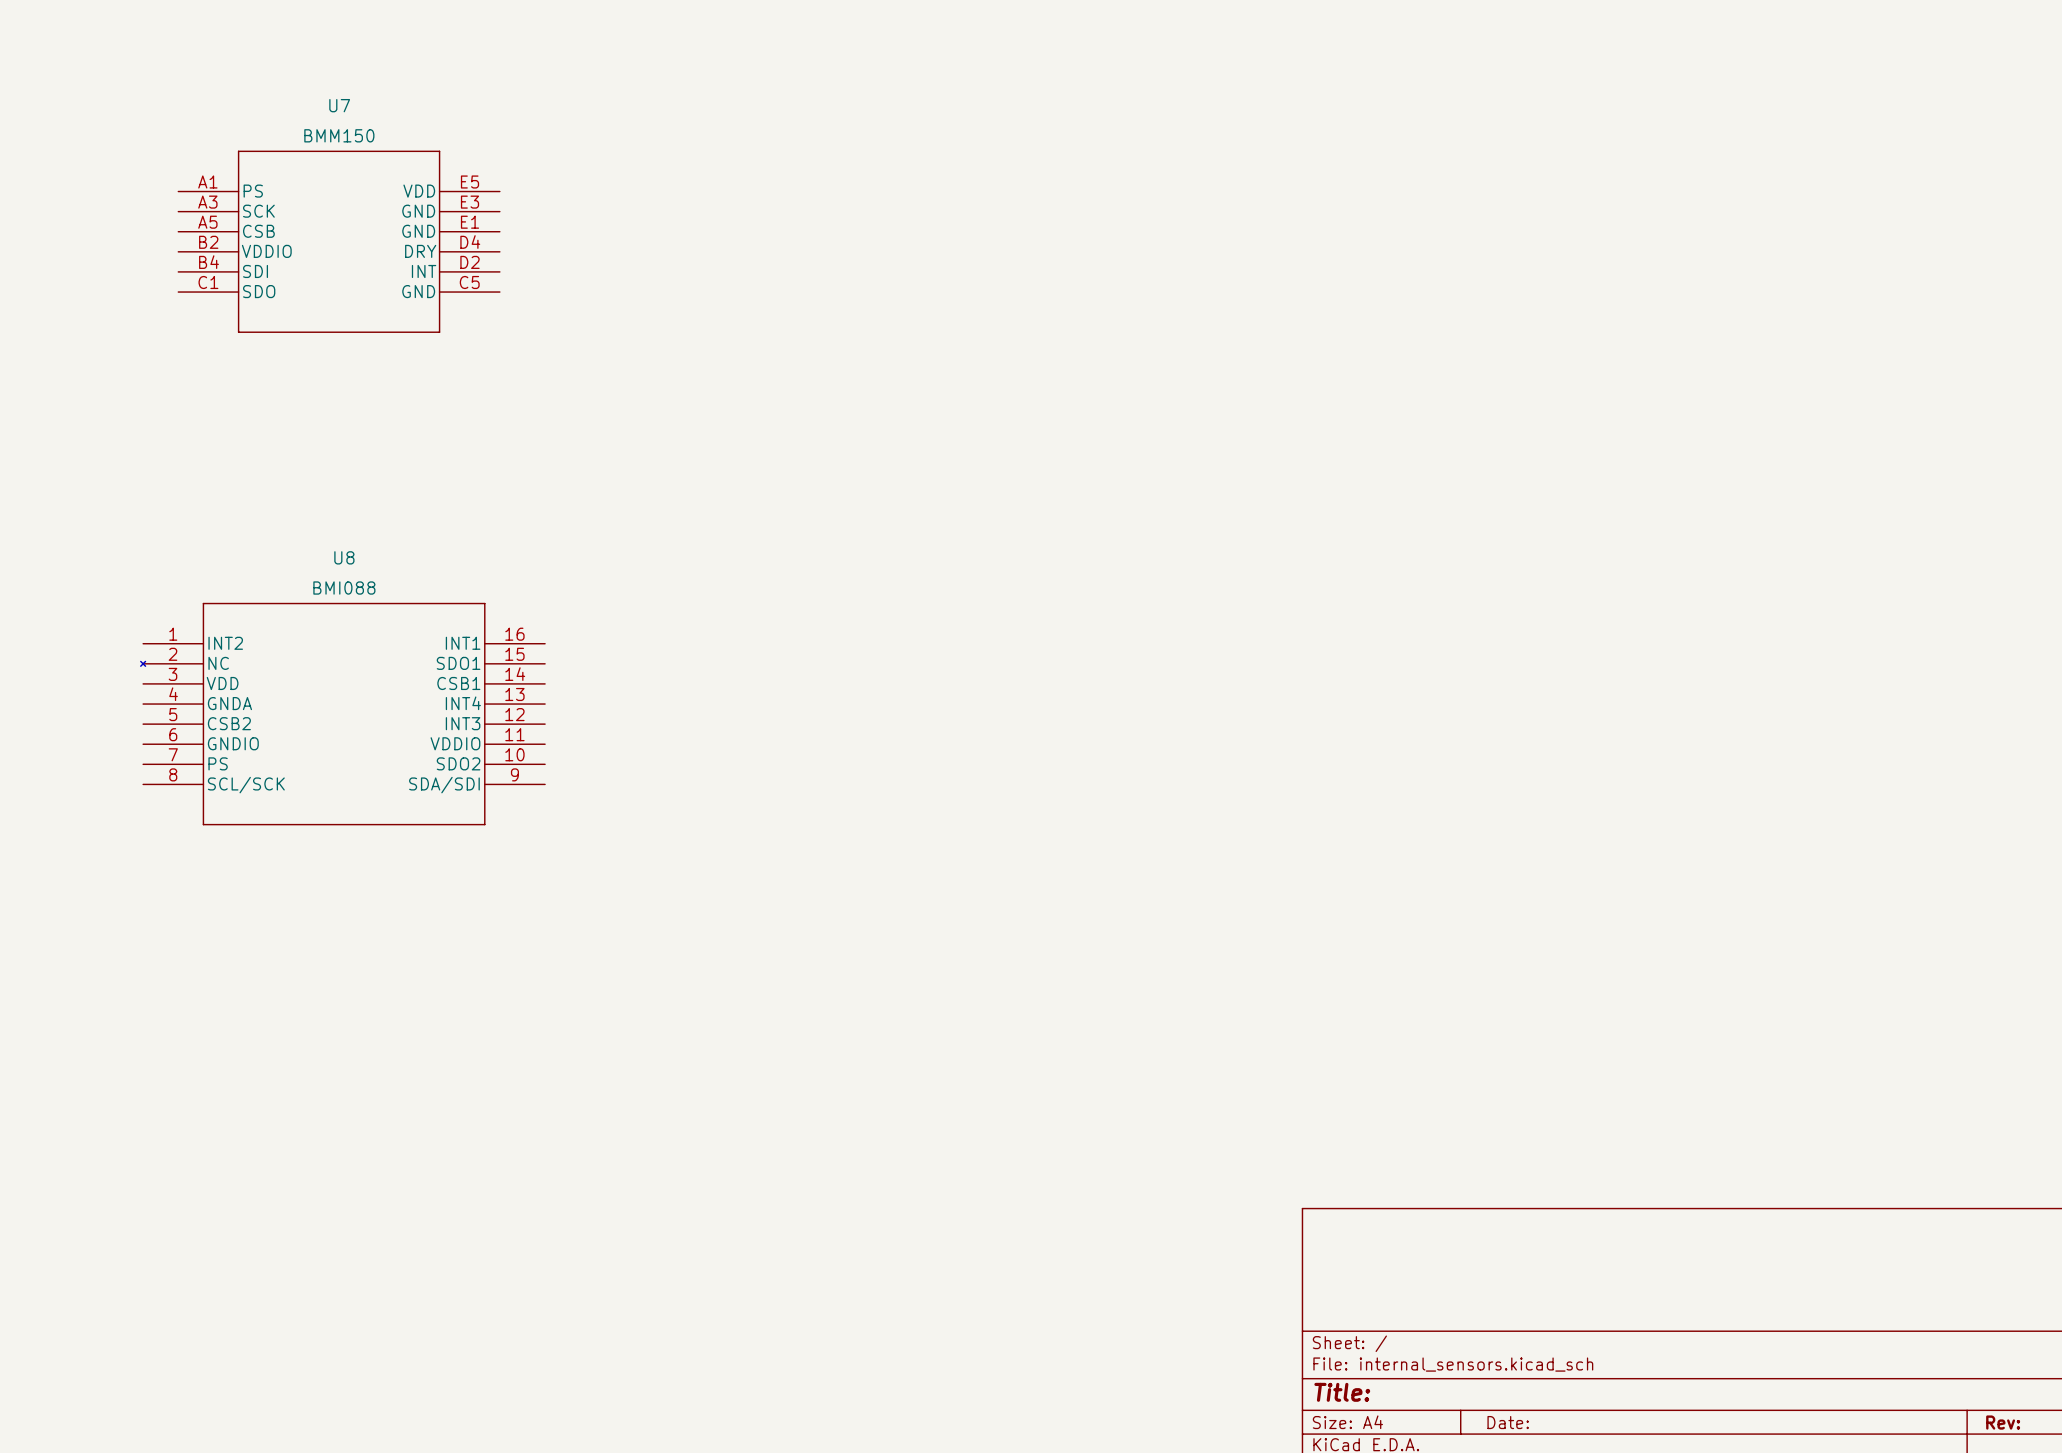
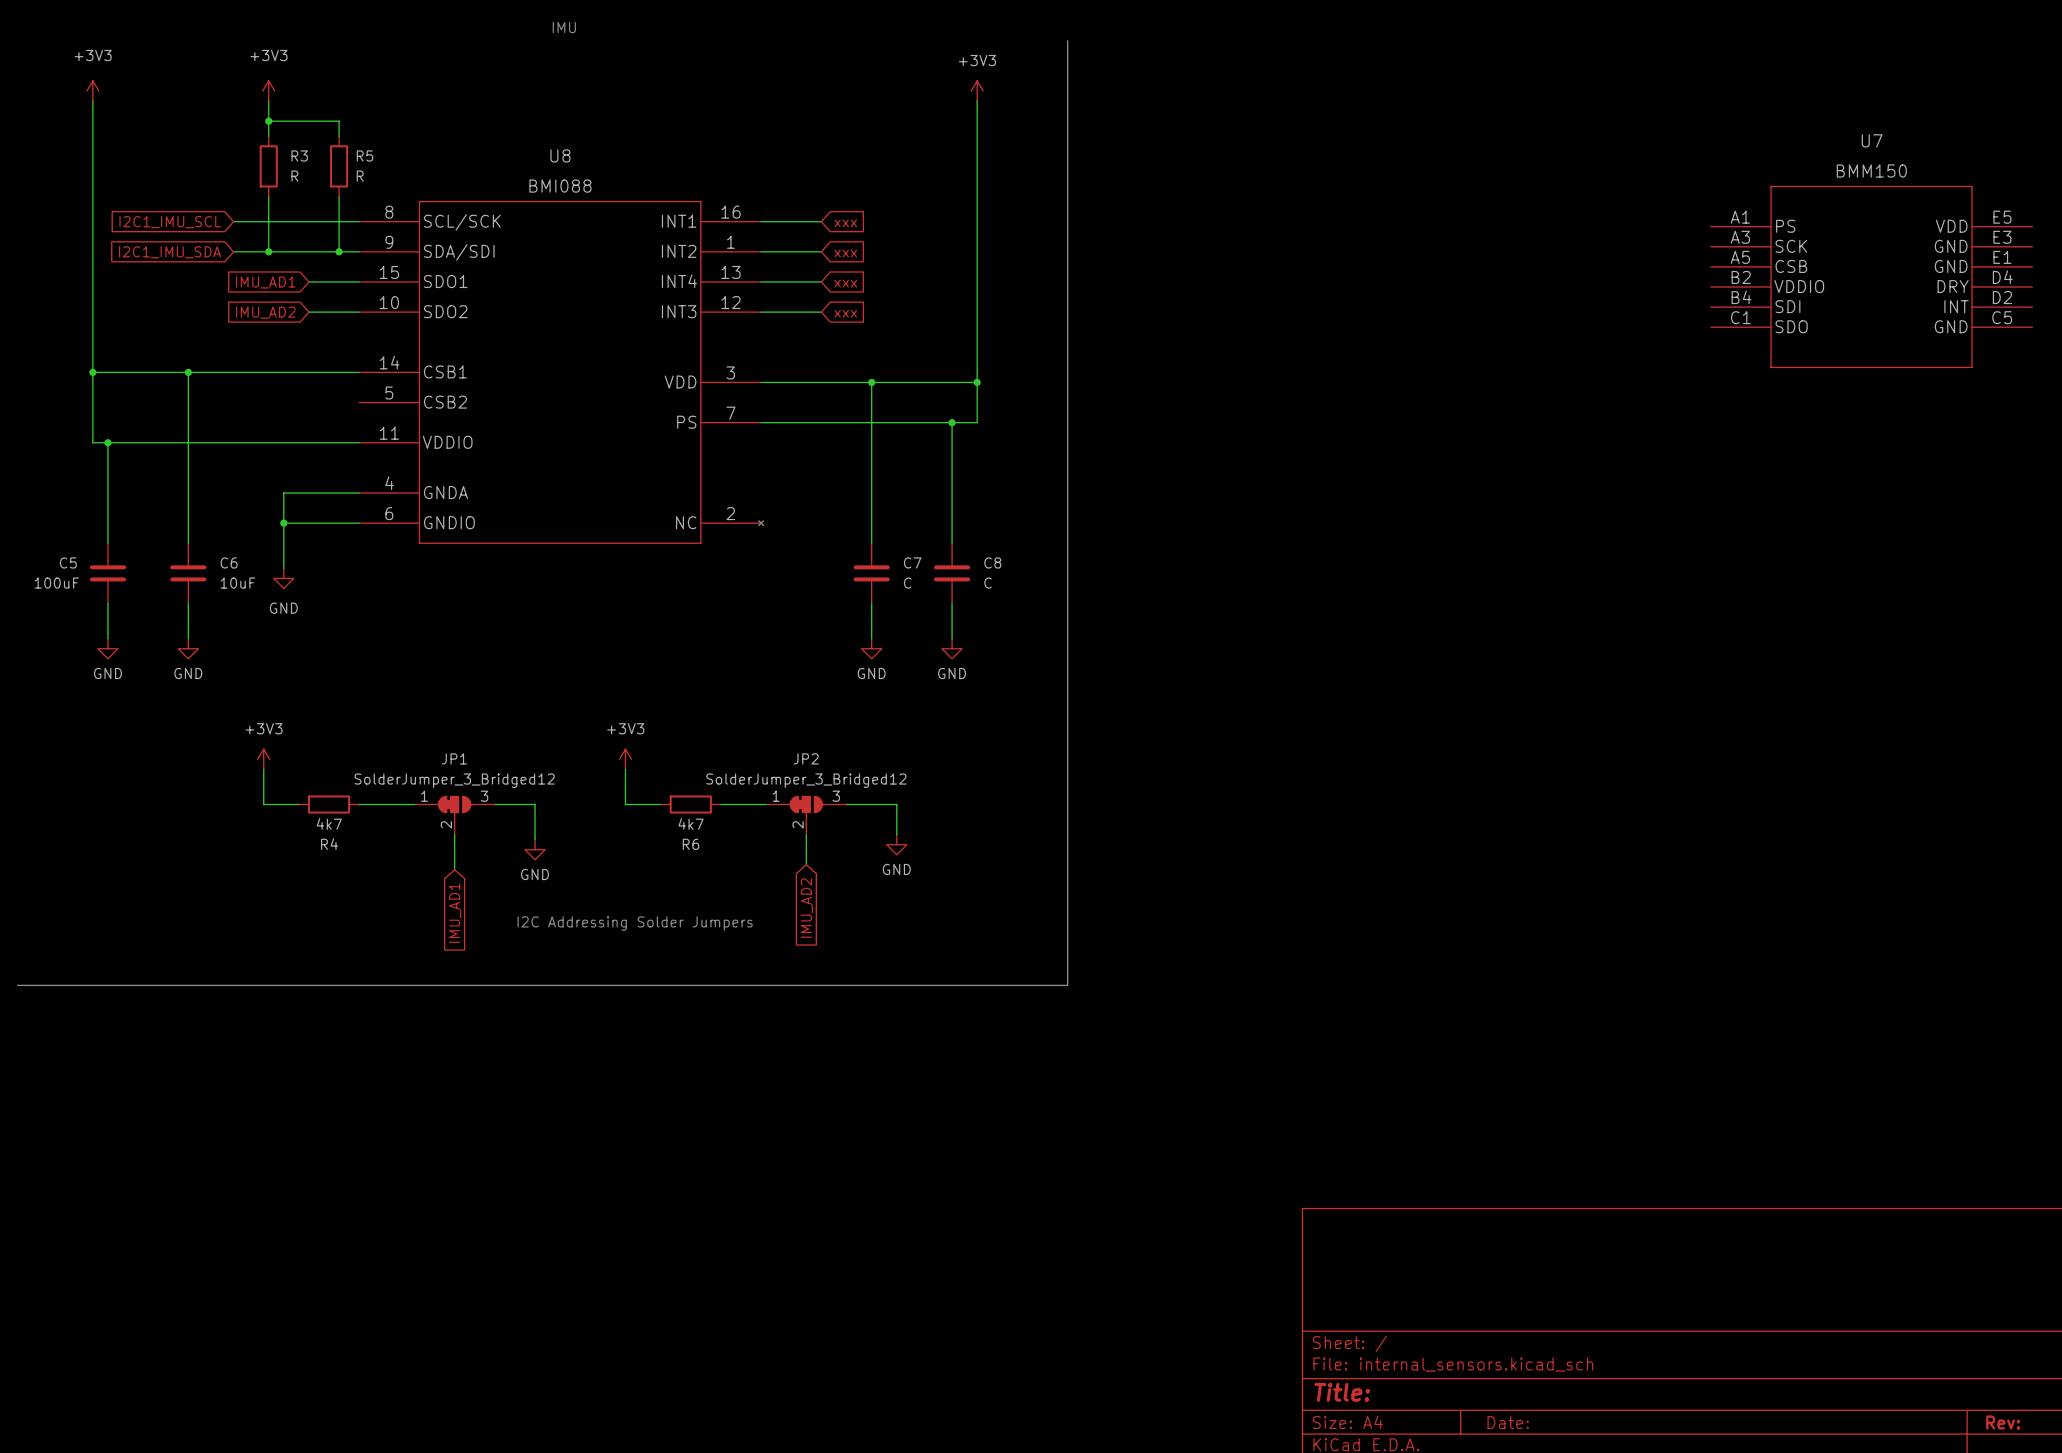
text: none -> IMU (564, 27)
line: none -> (1067, 40) (1067, 985) (17, 985)
power symbol: none -> +3V3 (92, 91)
power symbol: none -> +3V3 (268, 91)
power symbol: none -> +3V3 (977, 91)
wire: none -> (92, 101) (92, 442) (359, 442)
wire: none -> (268, 101) (268, 136)
wire: none -> (977, 101) (977, 422) (761, 422)
wire: none -> (268, 121) (339, 121) (339, 136)
junction: none -> (268, 121)
R3: none -> R (268, 166)
R5: none -> R (339, 166)
wire: none -> (268, 196) (268, 251)
wire: none -> (339, 196) (339, 251)
wire: none -> (233, 221) (359, 221)
wire: none -> (761, 221) (821, 221)
global label: none -> I2C1_IMU_SCL (170, 222)
global label: none -> xxx (845, 223)
U7 position: (339, 241) -> (1871, 276)
wire: none -> (233, 251) (359, 251)
junction: none -> (268, 251)
junction: none -> (339, 251)
wire: none -> (761, 251) (821, 251)
global label: none -> I2C1_IMU_SDA (170, 252)
global label: none -> xxx (845, 253)
wire: none -> (308, 281) (359, 281)
wire: none -> (761, 281) (821, 281)
global label: none -> IMU_AD1 (265, 282)
global label: none -> xxx (845, 283)
global label: none -> IMU_AD2 (265, 312)
wire: none -> (308, 312) (359, 312)
wire: none -> (761, 312) (821, 312)
global label: none -> xxx (845, 313)
wire: none -> (92, 372) (359, 372)
junction: none -> (92, 372)
wire: none -> (188, 372) (188, 543)
junction: none -> (188, 372)
wire: none -> (761, 382) (977, 382)
wire: none -> (871, 382) (871, 543)
junction: none -> (871, 382)
junction: none -> (977, 382)
wire: none -> (952, 422) (952, 543)
junction: none -> (952, 422)
wire: none -> (107, 442) (107, 543)
junction: none -> (107, 442)
wire: none -> (359, 493) (283, 493) (283, 568)
wire: none -> (283, 523) (359, 523)
junction: none -> (283, 523)
U8 name position: U8 (344, 557) -> U8 (560, 155)
C5: none -> 100uF (107, 573)
C6: none -> 10uF (188, 573)
C7: none -> C (871, 573)
C8: none -> C (952, 573)
power symbol: none -> GND (283, 578)
U8 value position: BMI088 (344, 588) -> BMI088 (560, 186)
wire: none -> (107, 603) (107, 638)
U8 symbol: [140, 603, 546, 826] -> [359, 201, 764, 544]
wire: none -> (188, 603) (188, 638)
wire: none -> (871, 603) (871, 638)
wire: none -> (952, 603) (952, 638)
power symbol: none -> GND (107, 648)
power symbol: none -> GND (188, 648)
power symbol: none -> GND (871, 648)
power symbol: none -> GND (952, 648)
power symbol: none -> +3V3 (263, 759)
power symbol: none -> +3V3 (625, 759)
wire: none -> (263, 769) (263, 804) (298, 804)
wire: none -> (625, 769) (625, 804) (660, 804)
R4: none -> 4k7 (329, 804)
wire: none -> (359, 804) (414, 804)
wire: none -> (494, 804) (535, 804) (535, 839)
R6: none -> 4k7 (690, 804)
wire: none -> (720, 804) (766, 804)
wire: none -> (846, 804) (896, 804) (896, 834)
JP1: none -> SolderJumper_3_Bridged12 (454, 815)
JP2: none -> SolderJumper_3_Bridged12 (806, 815)
wire: none -> (454, 834) (454, 869)
wire: none -> (806, 834) (806, 864)
power symbol: none -> GND (896, 844)
power symbol: none -> GND (535, 849)
global label: none -> IMU_AD2 (806, 908)
global label: none -> IMU_AD1 (455, 913)
text: none -> I2C Addressing Solder Jumpers (635, 923)

